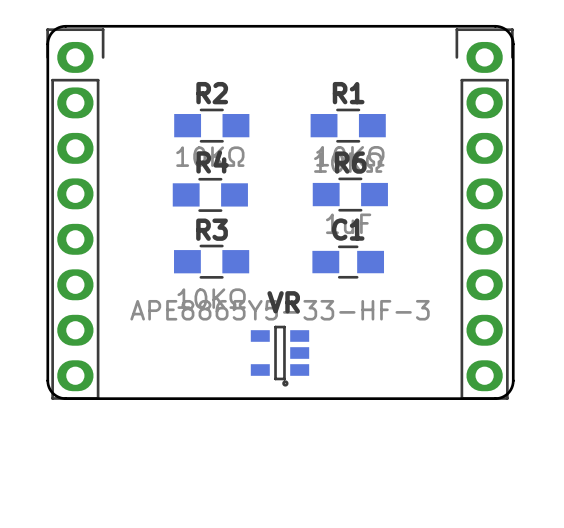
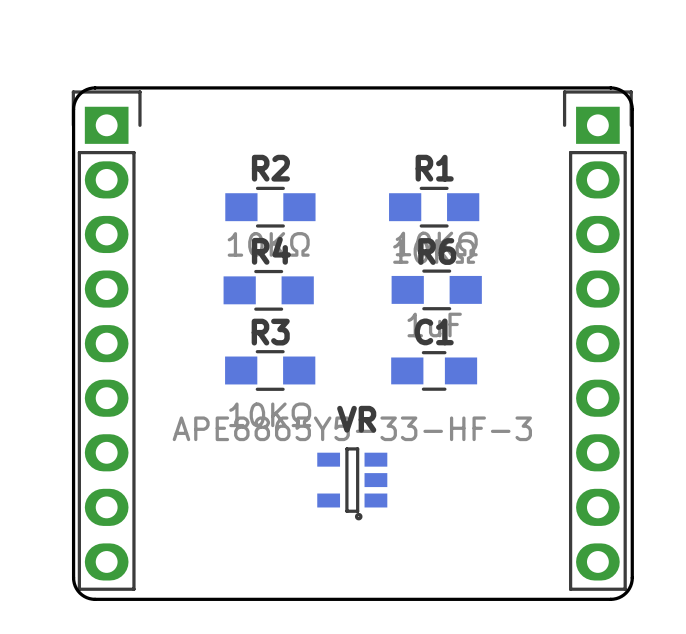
part: (75, 214) -> none
part: (484, 214) -> none
part: none -> (106, 340)
part: none -> (597, 340)
board edge: (513, 380) (508, 393) (495, 398) (65, 398) (53, 393) (47, 380) -> (632, 513) (631, 583) (623, 594) (610, 599) (92, 599) (79, 593) (74, 583) (73, 513)

